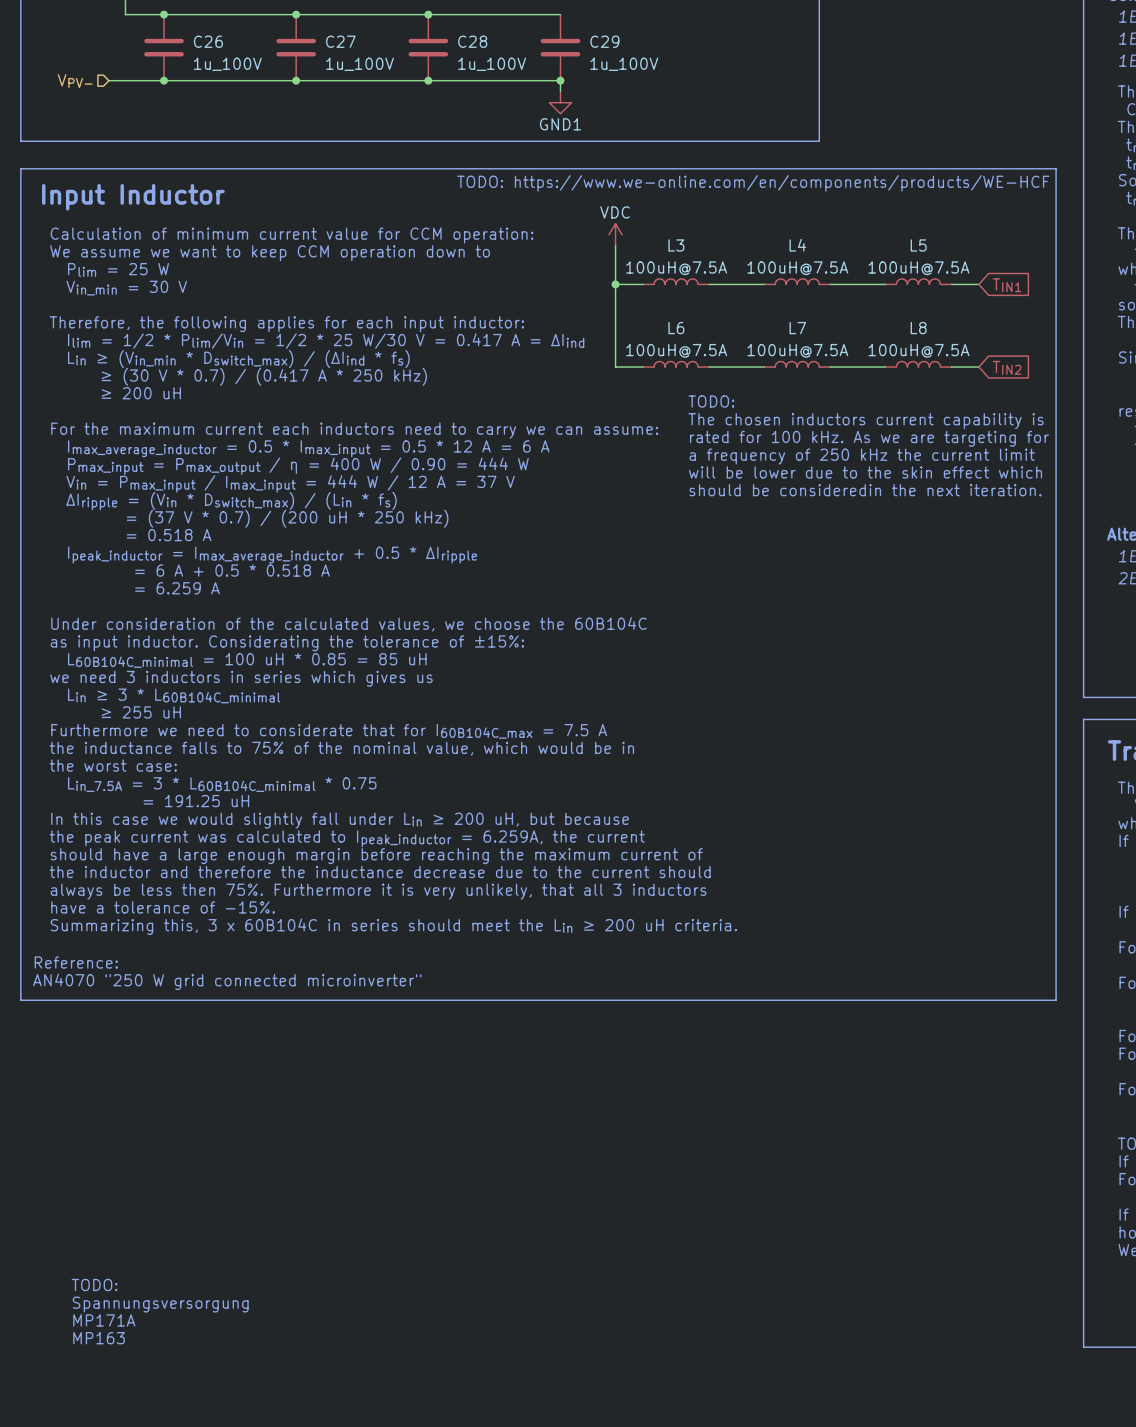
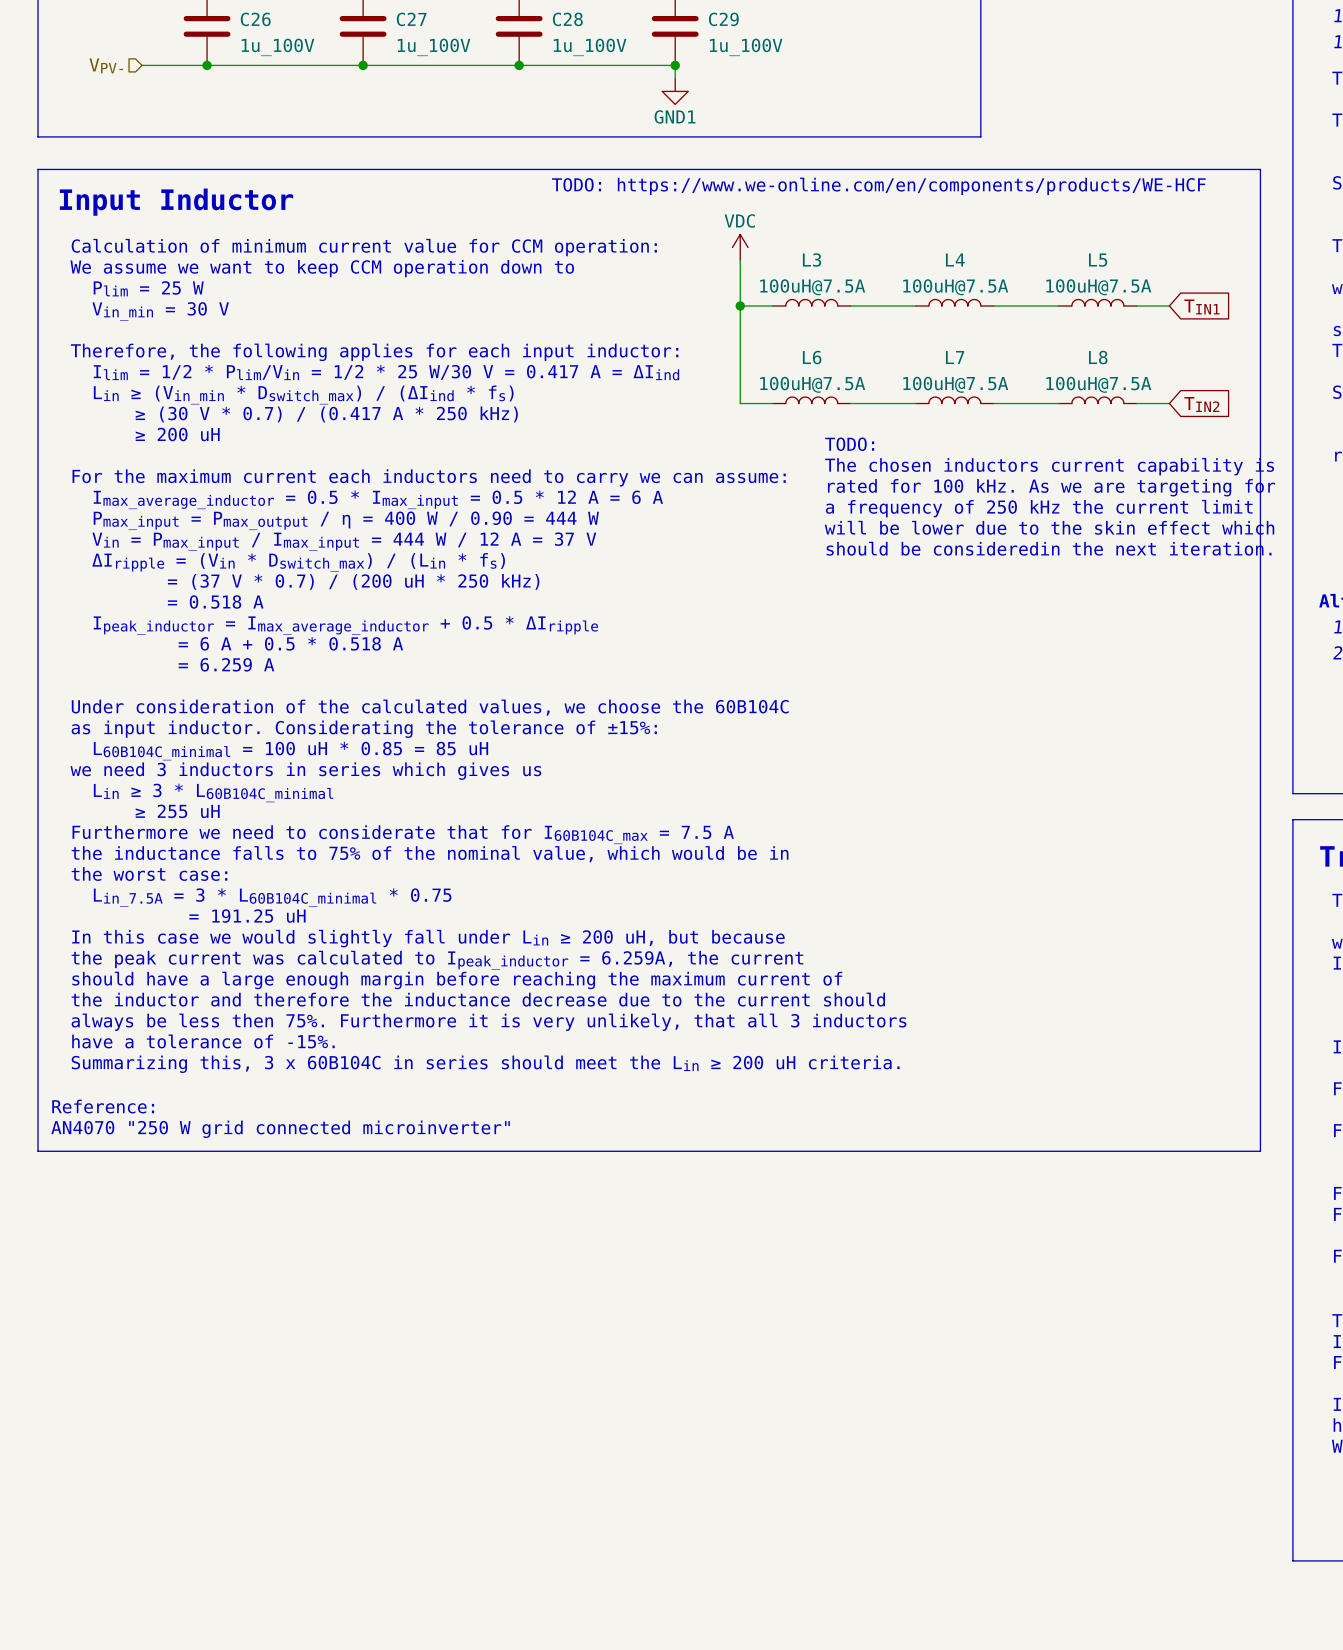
text: TODO: (94, 1284) -> none
text: Spannungsversorgung (160, 1304) -> none
text: MP171A (104, 1320) -> none
text: MP163 (99, 1338) -> none

